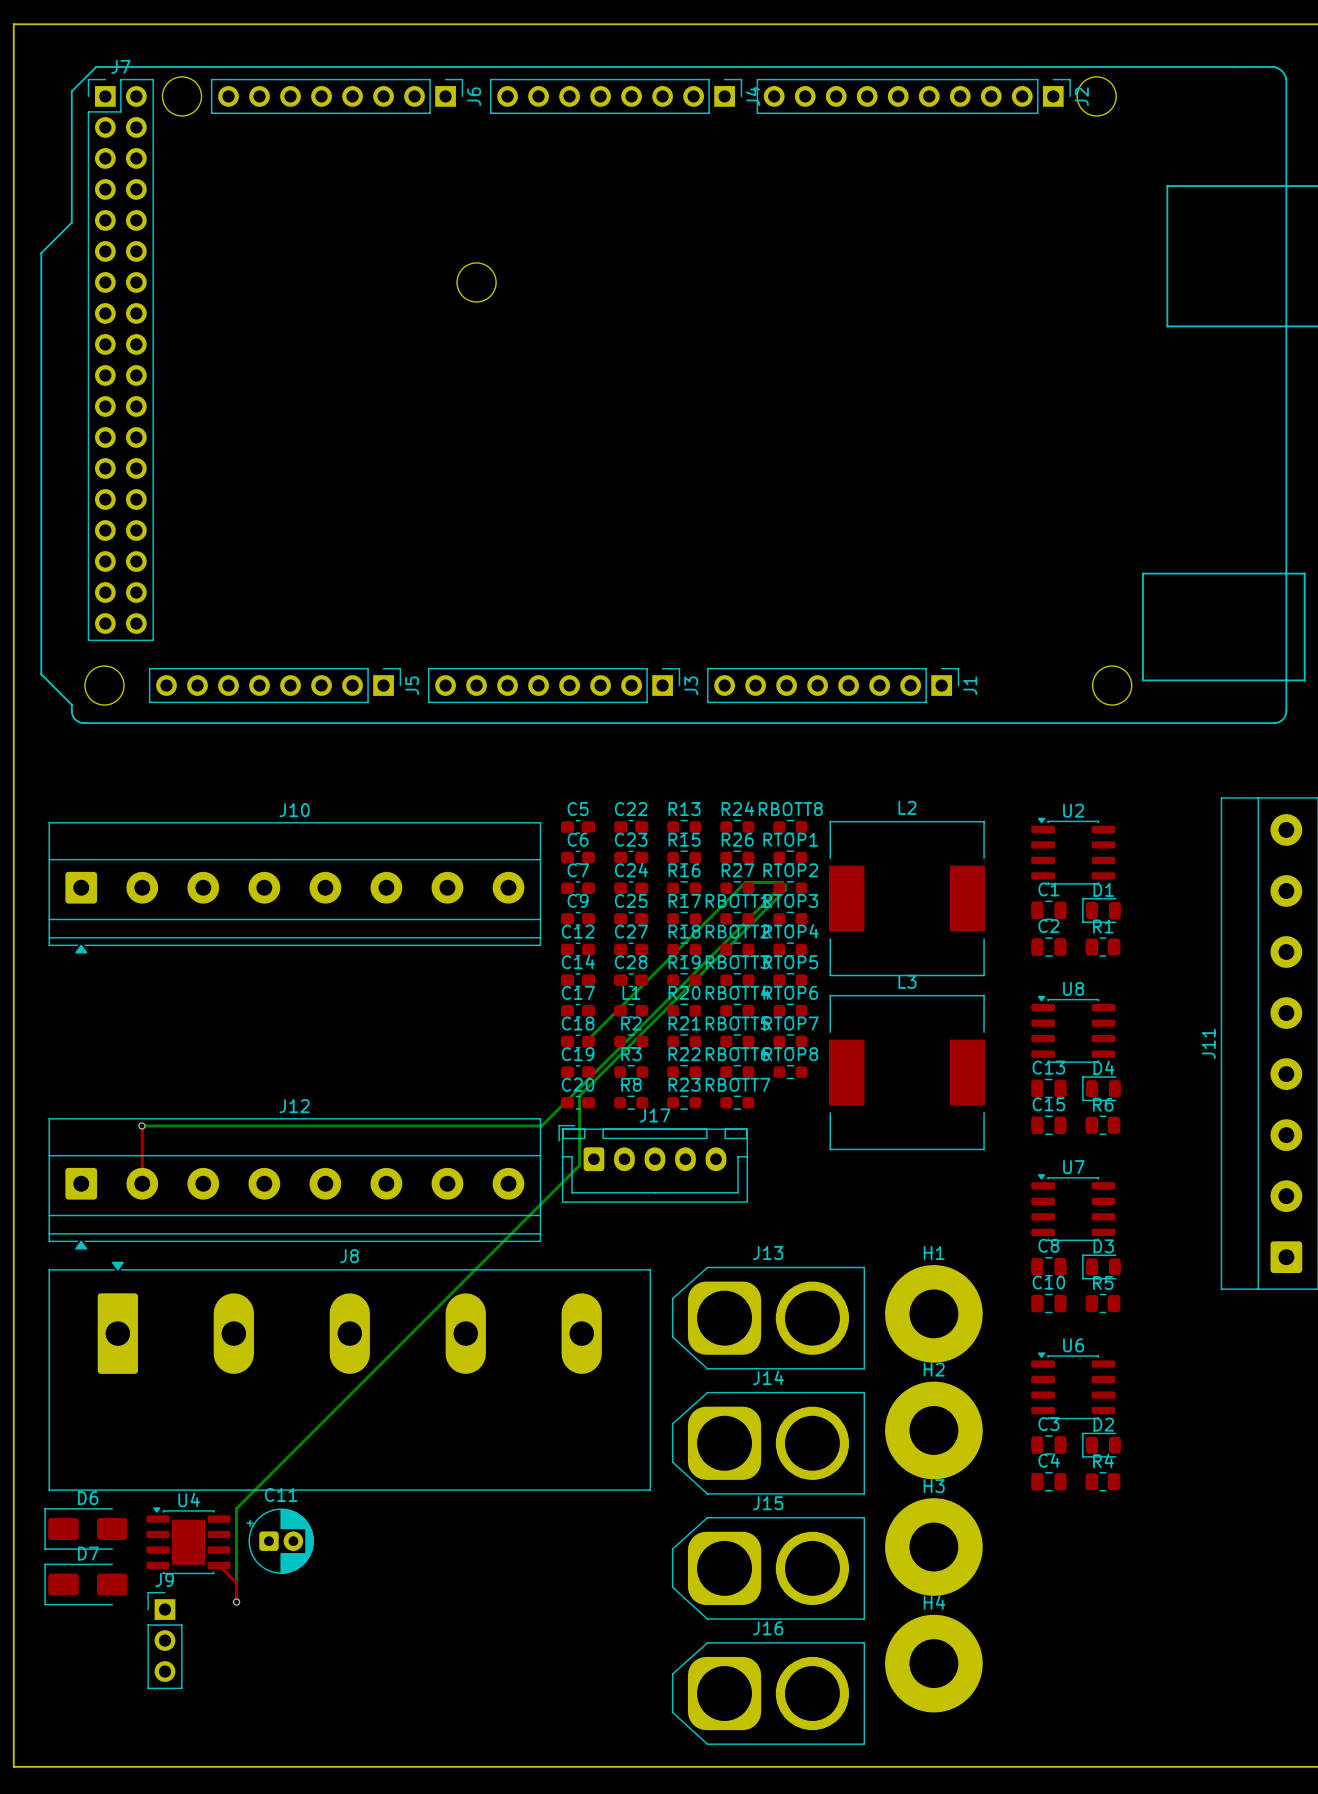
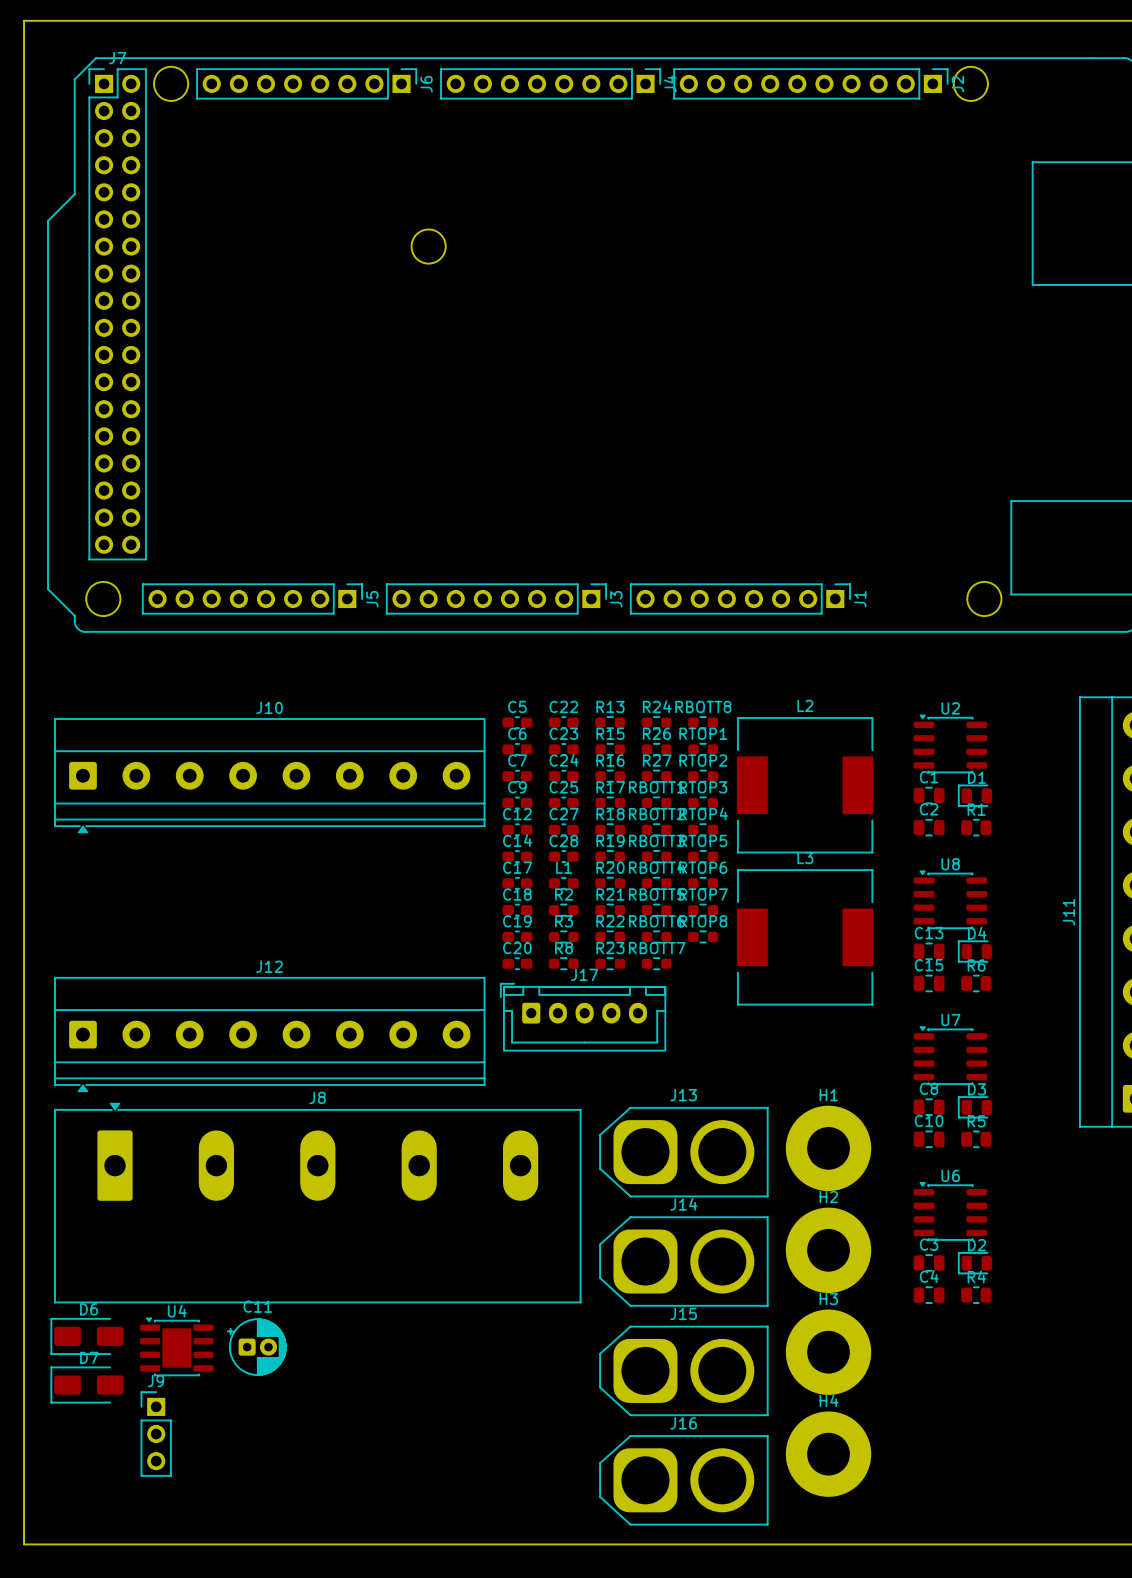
bottom track: (779, 887) (541, 1125) (141, 1125) -> none
bottom track: (587, 1040) (745, 882) (782, 882) (785, 885) (785, 890) (579, 1095) (579, 1165) (236, 1508) (236, 1602) -> none
top track: (141, 1125) (142, 1183) -> none
via: (141, 1125) -> none
top track: (219, 1565) (236, 1582) (236, 1602) -> none
via: (236, 1602) -> none

